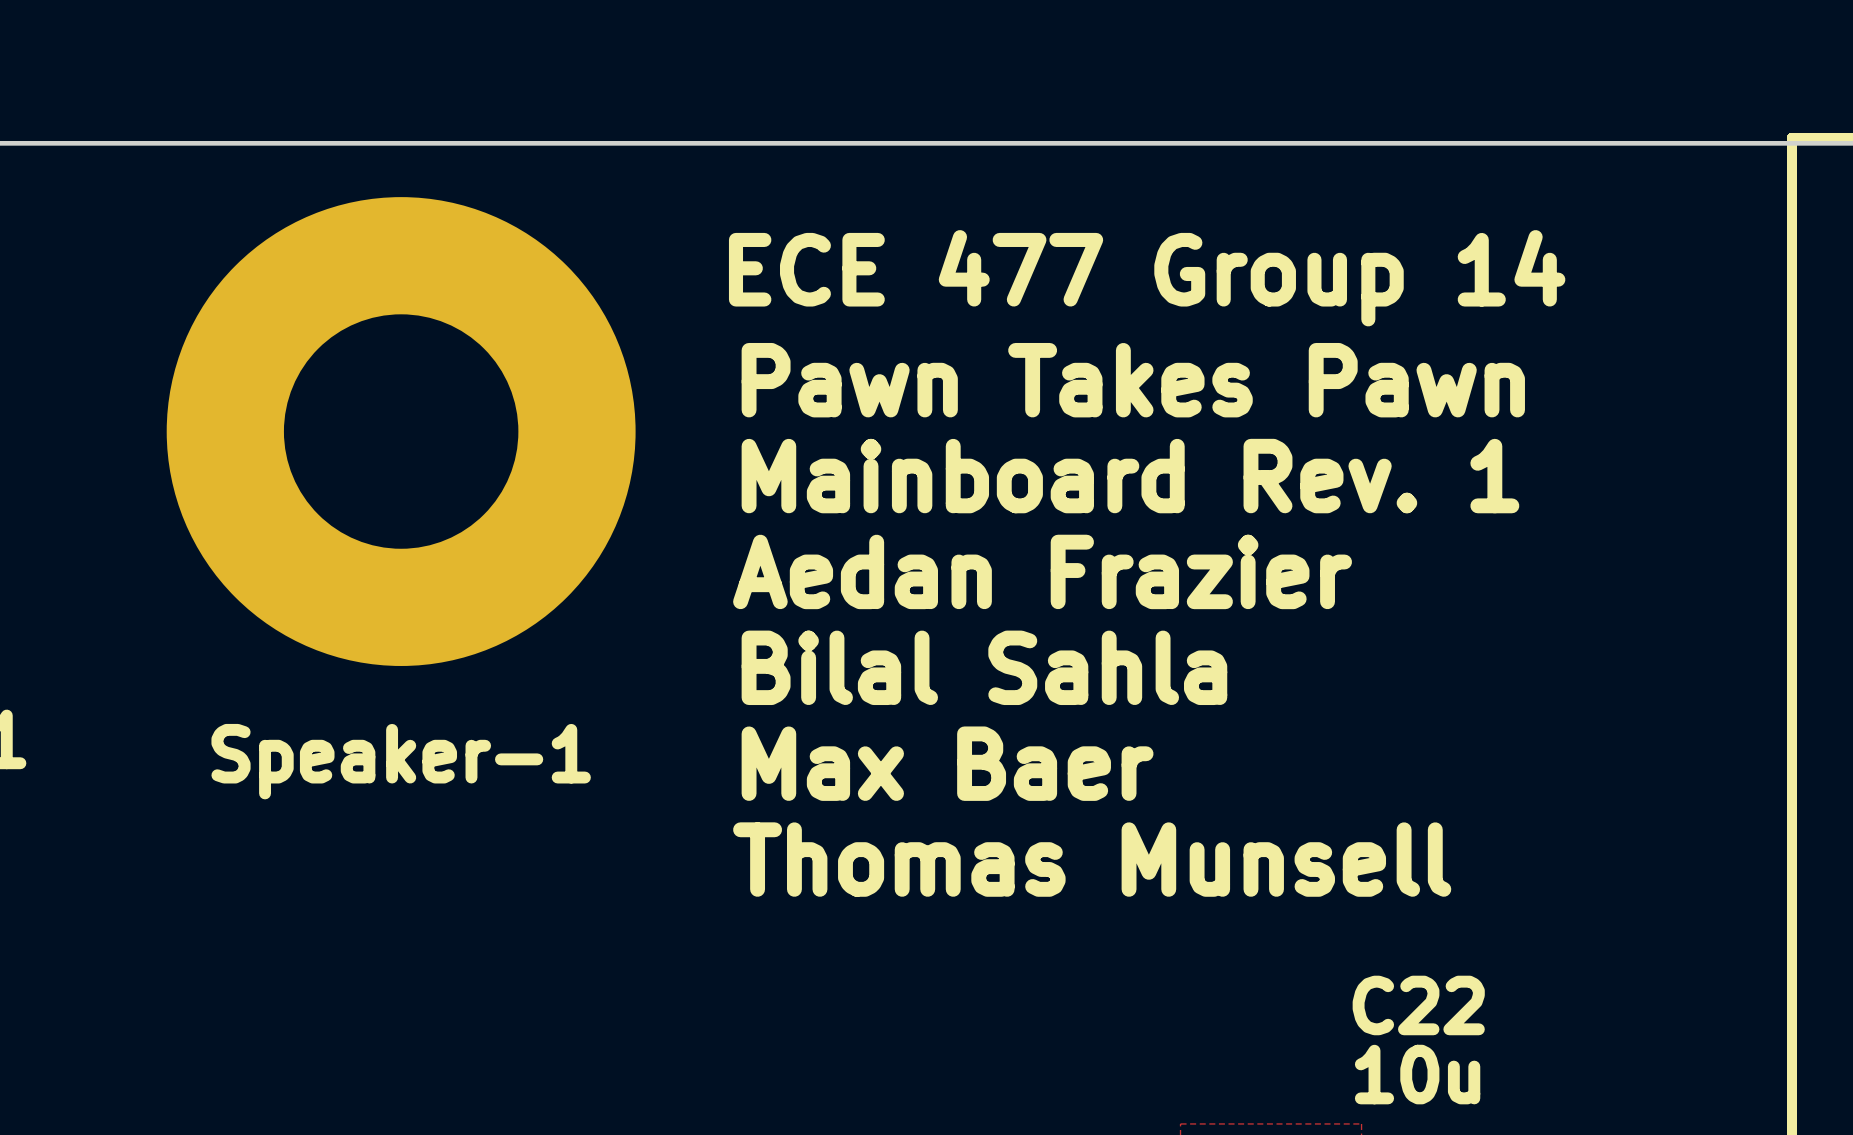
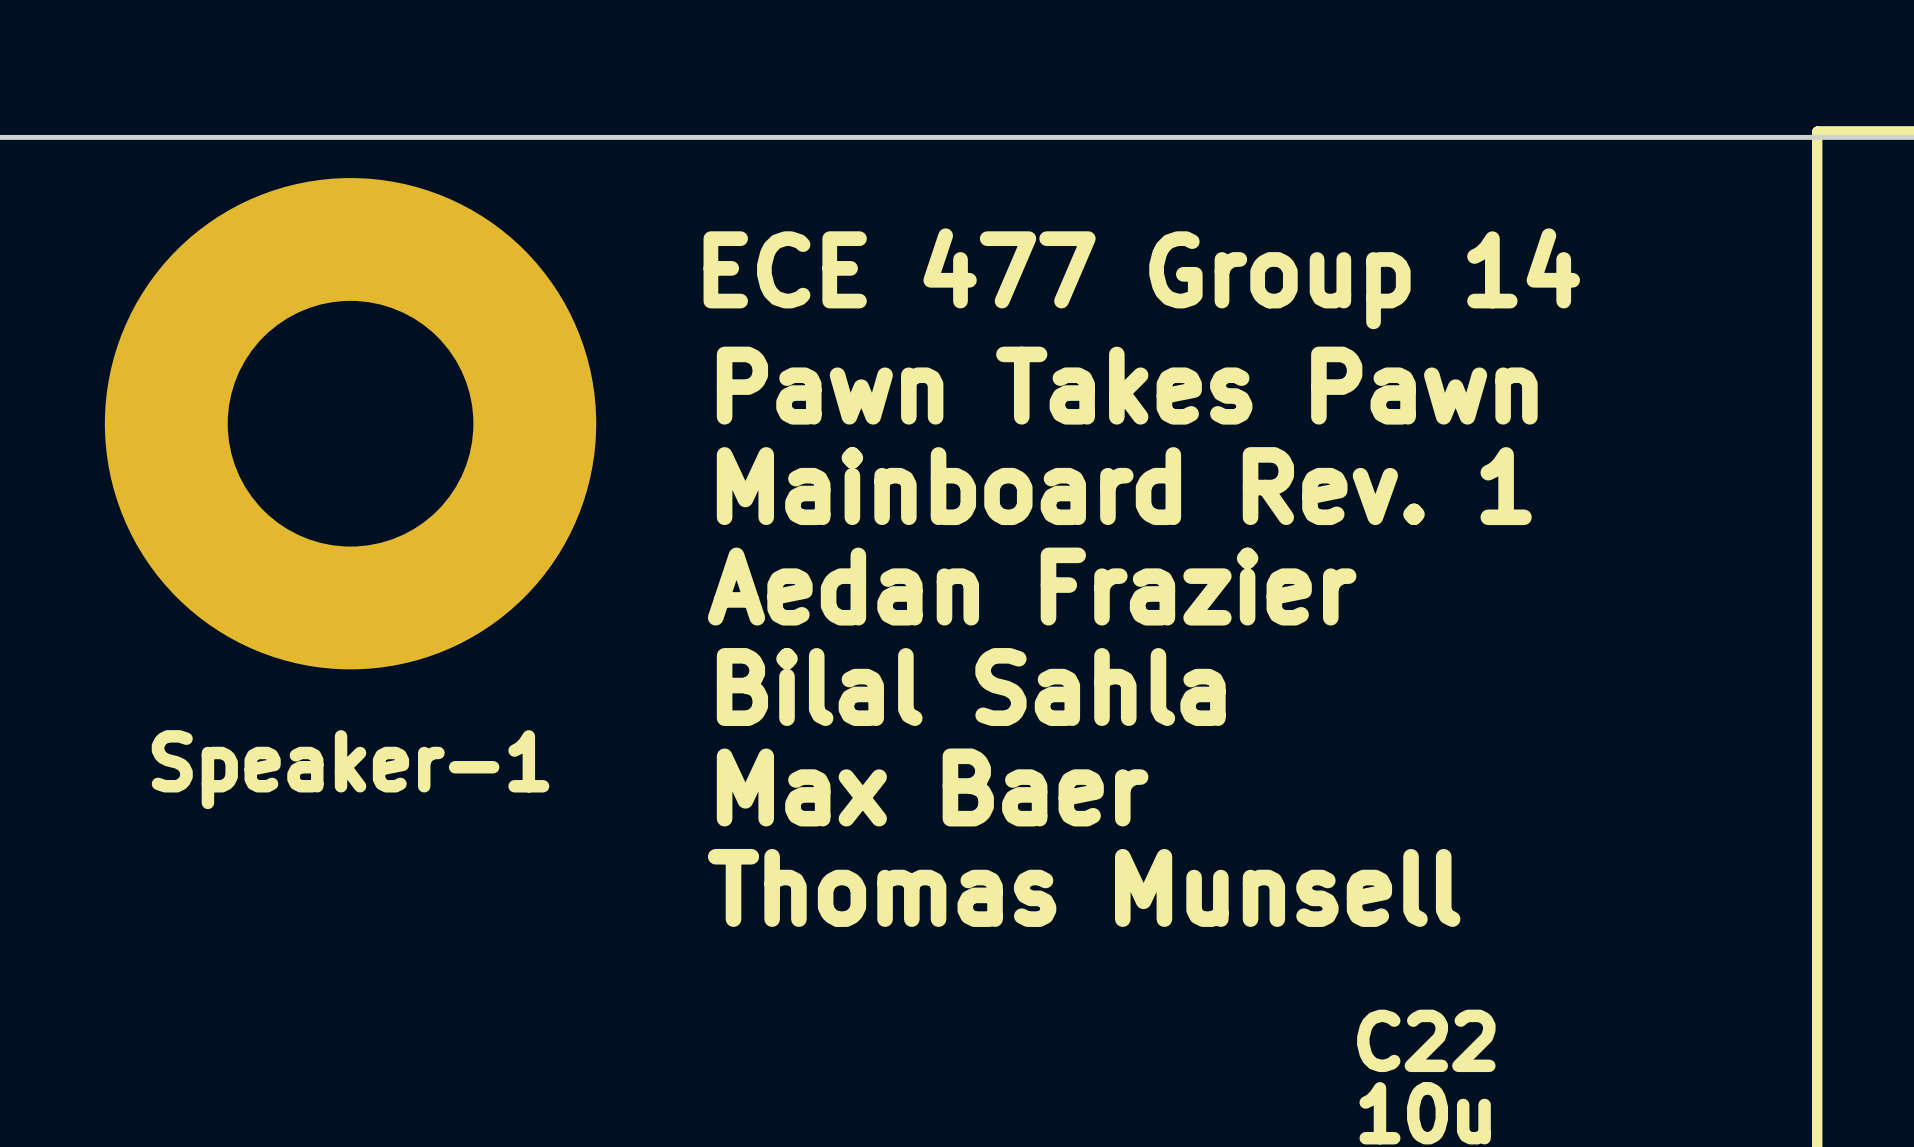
Speaker-1 position: (401, 431) -> (350, 423)

